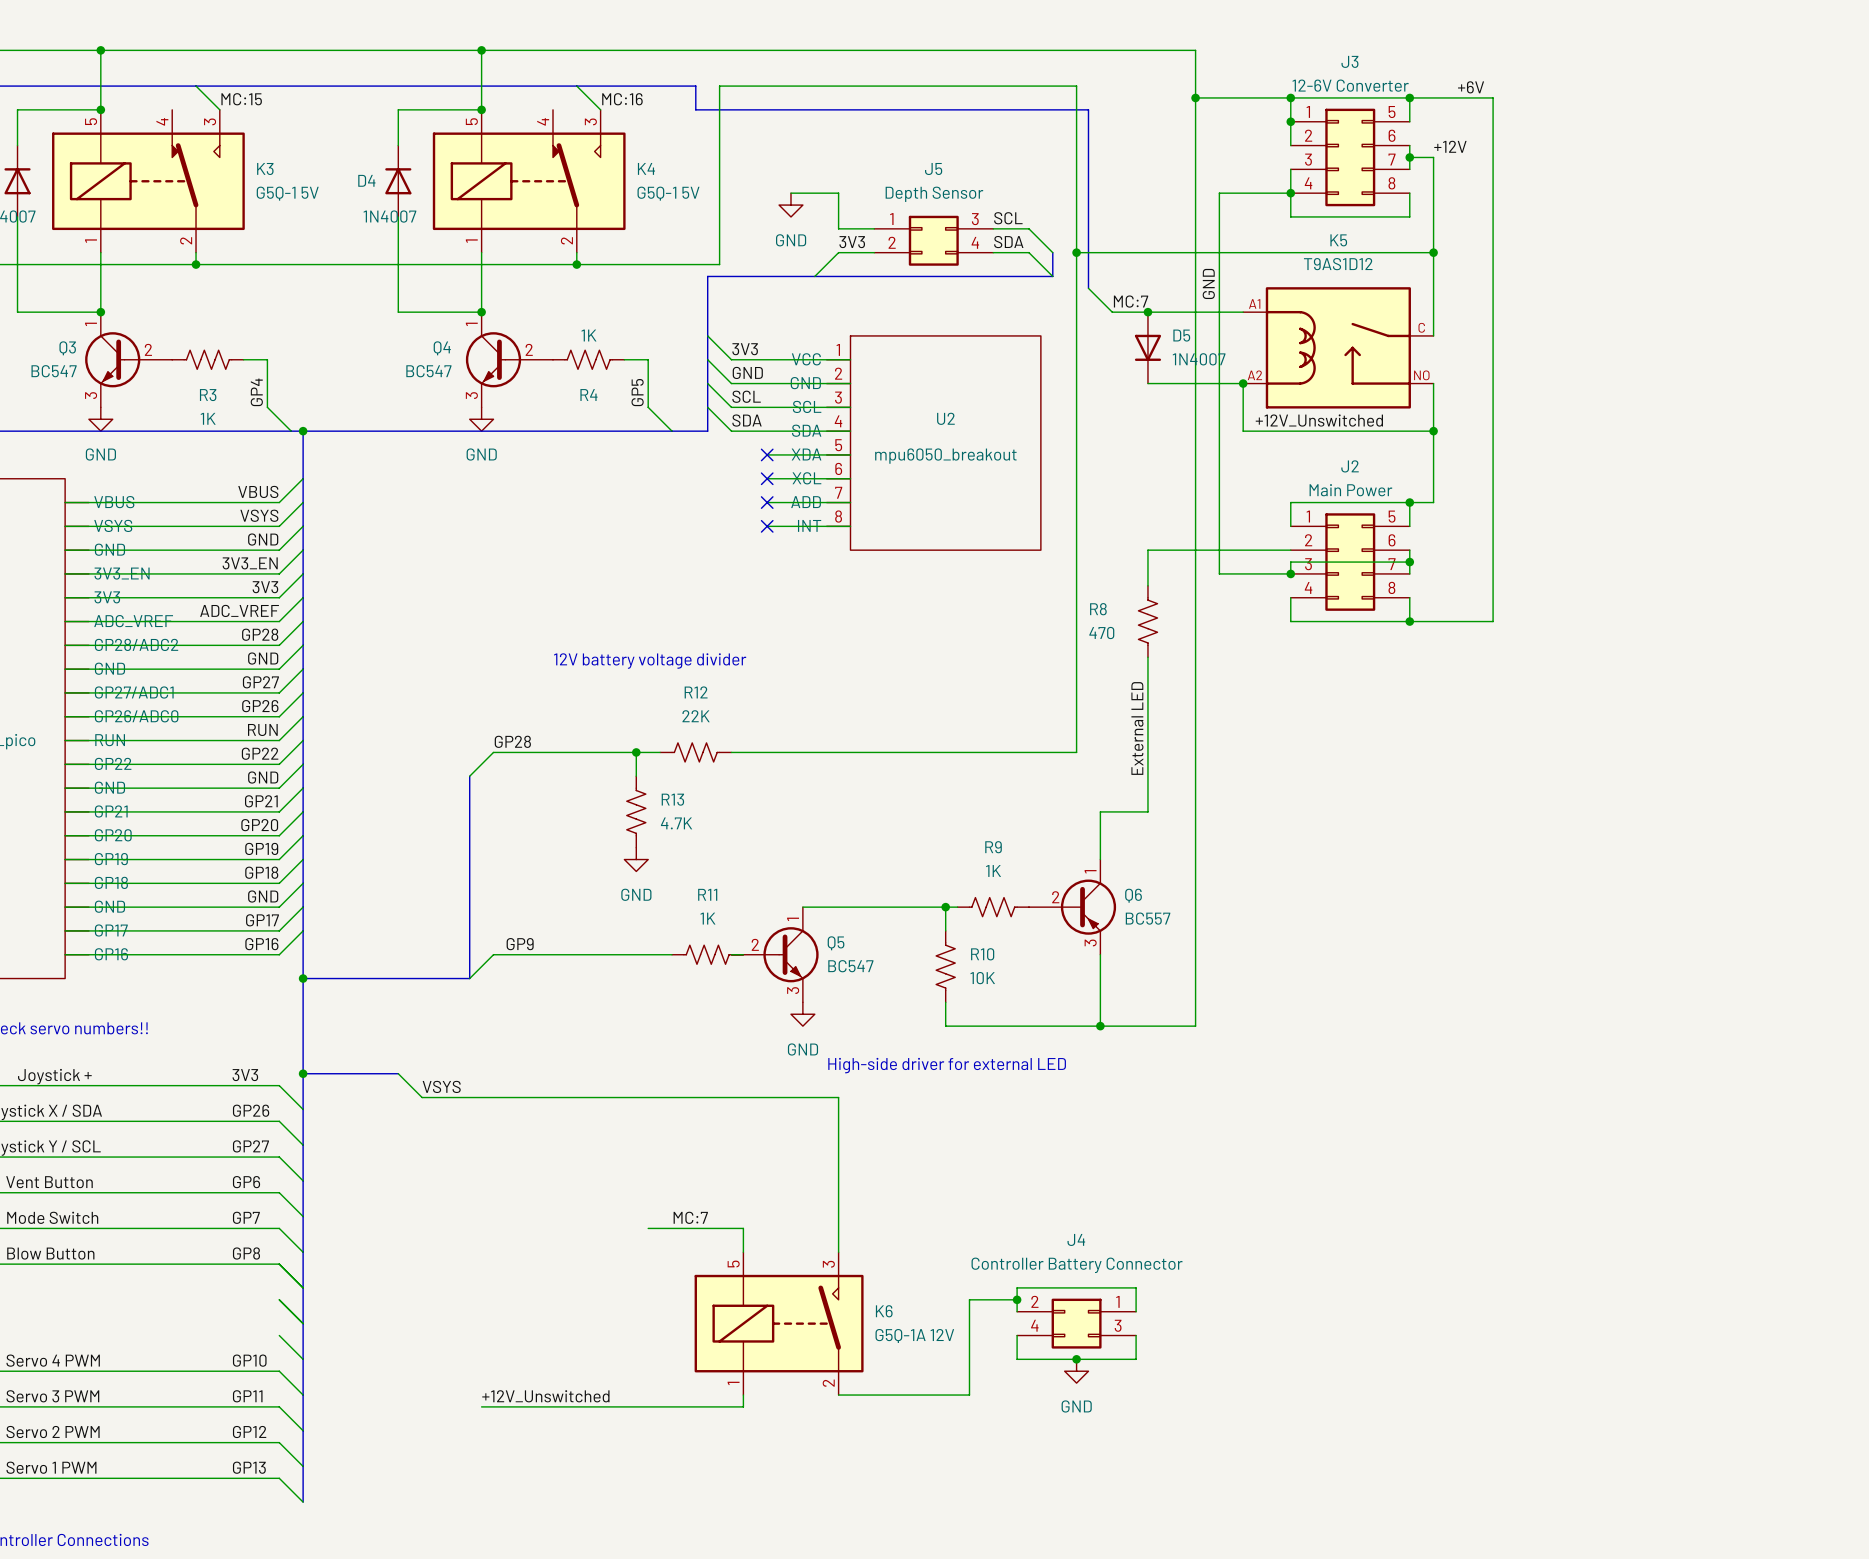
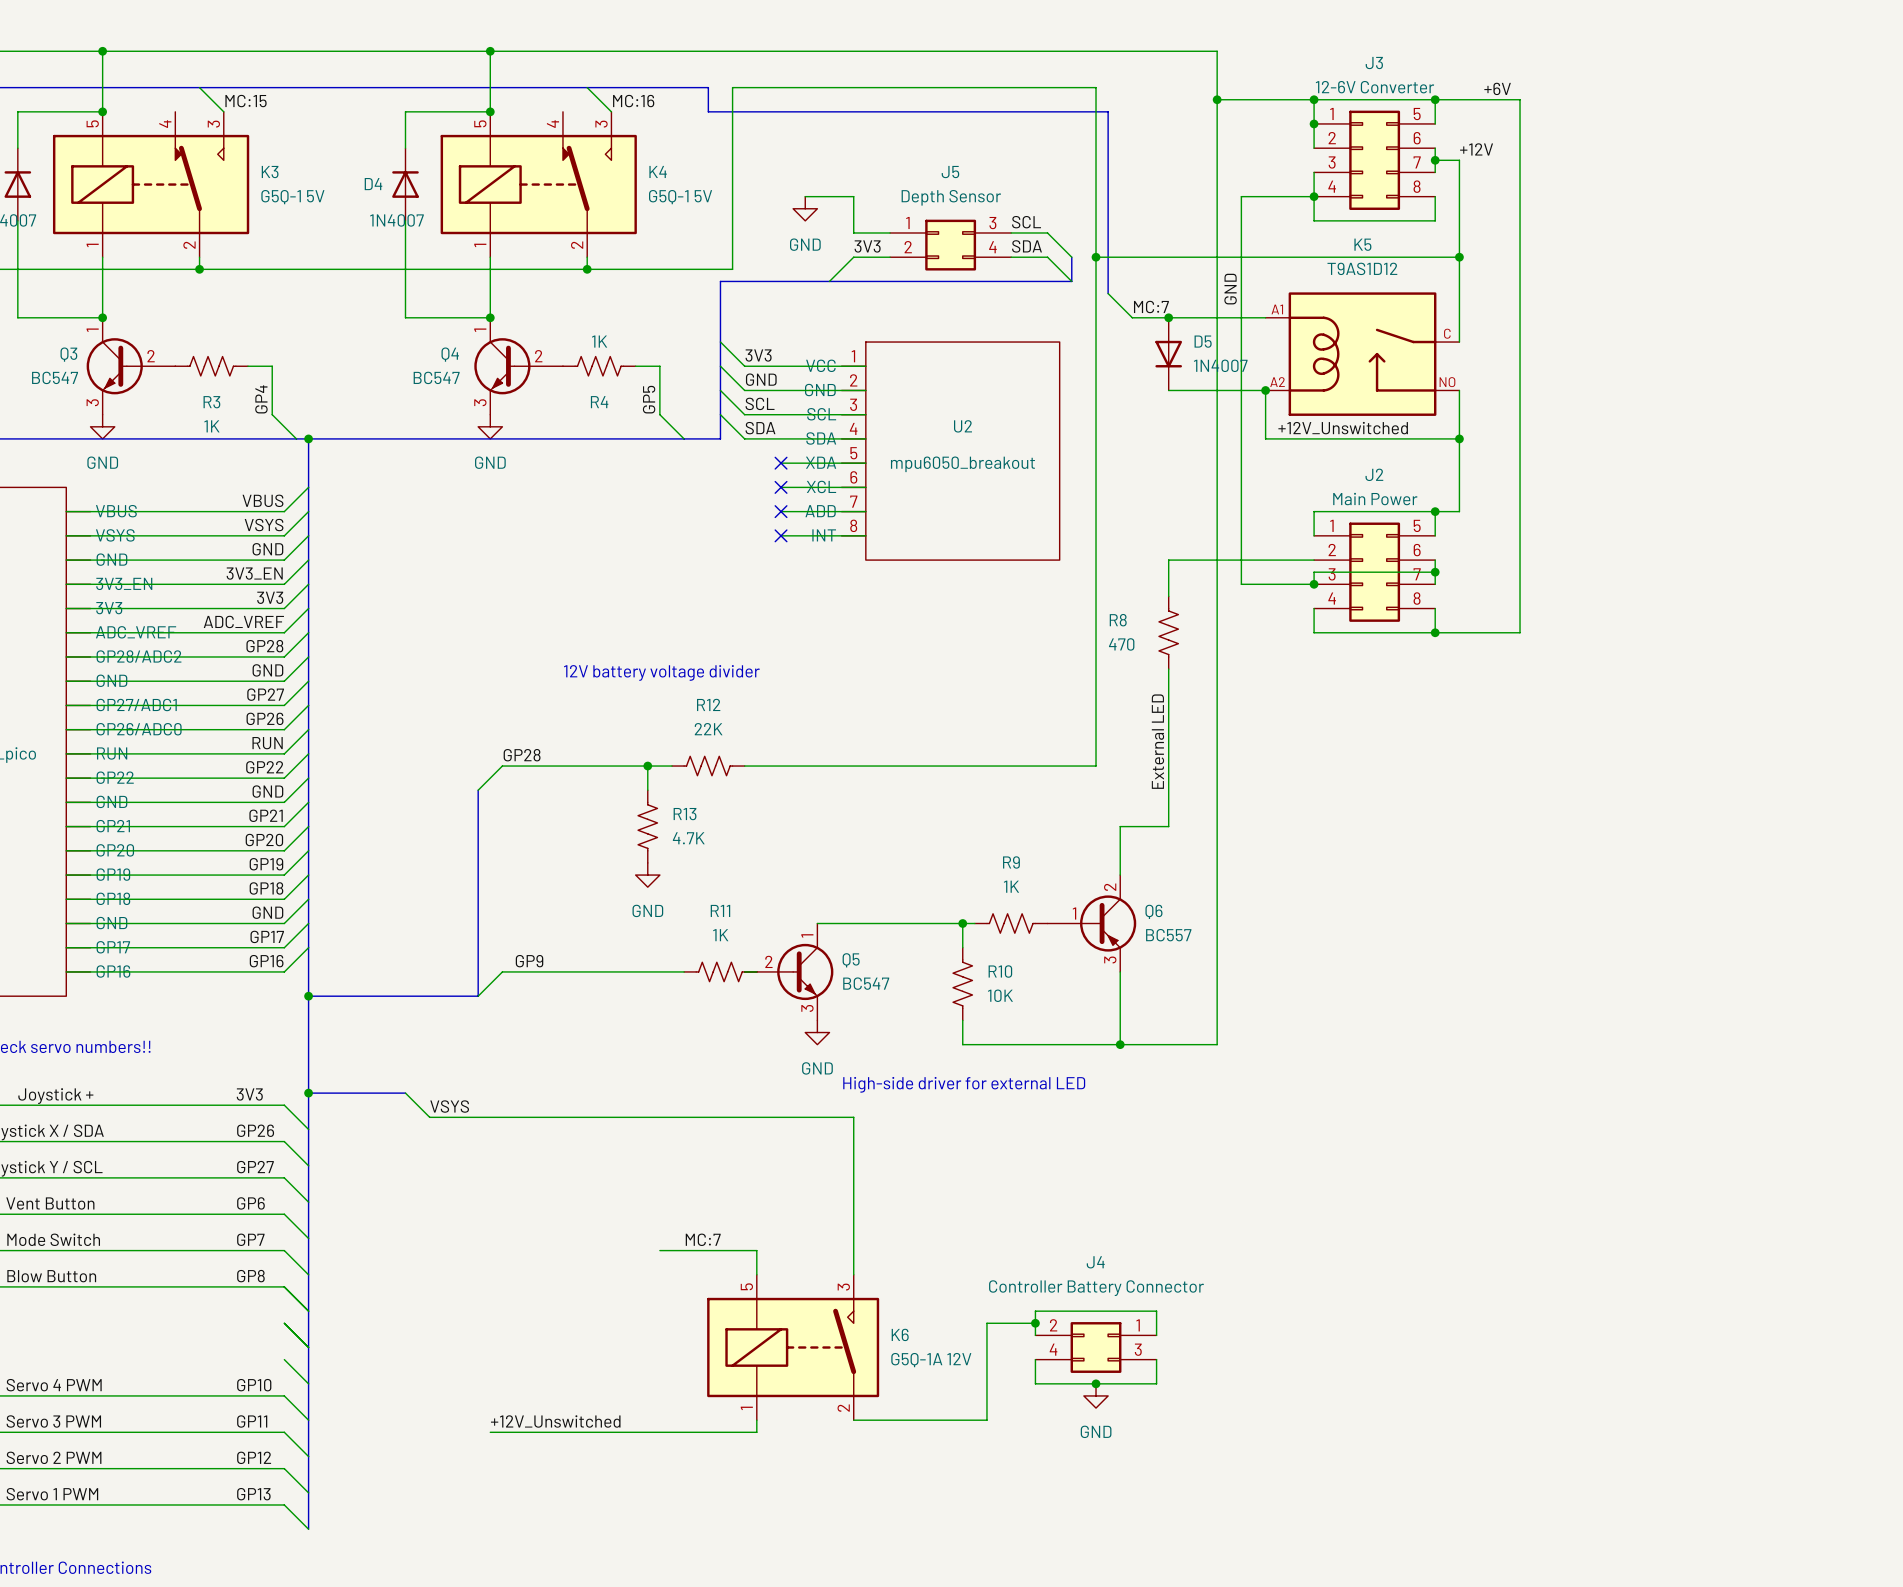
K5 symbol: [1243, 287, 1434, 409] -> [1265, 292, 1460, 416]
Q6 pin number: 1 (1090, 871) -> 2 (1110, 887)
Q6 pin number: 2 (1055, 897) -> 1 (1074, 913)

